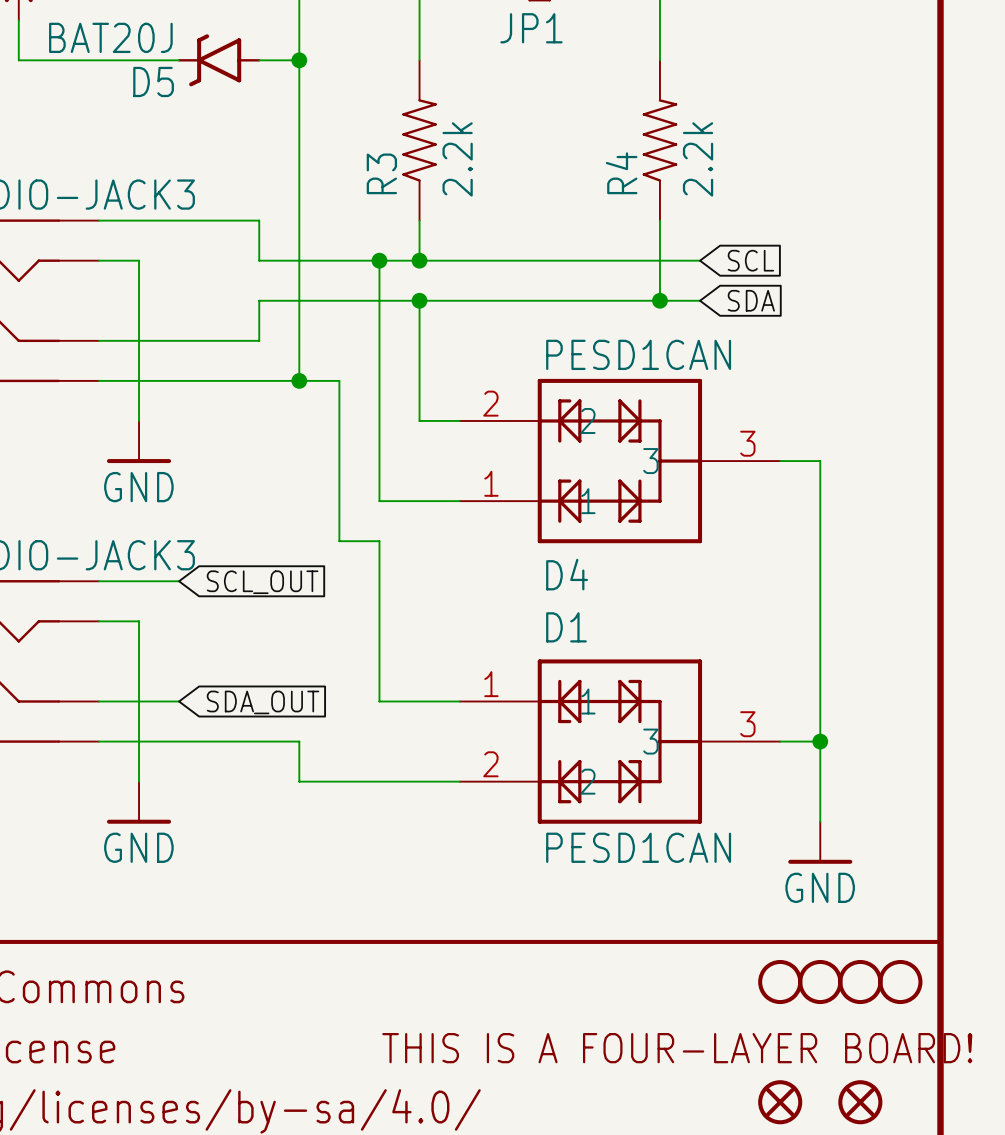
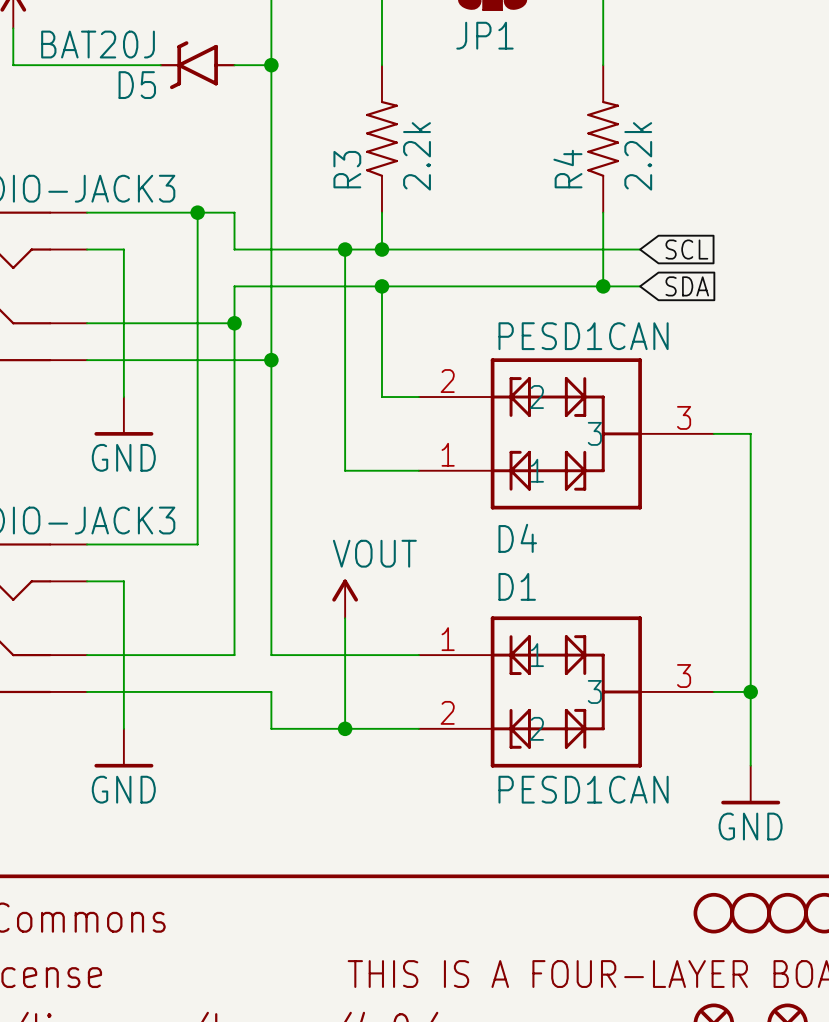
wire: none -> (197, 212) (197, 544) (160, 544)
junction: none -> (197, 212)
wire: none -> (234, 323) (234, 655) (160, 655)
junction: none -> (234, 323)
wire: (299, 380) (339, 380) (339, 541) (379, 541) (379, 661) -> (271, 360) (271, 655) (345, 655) (345, 728)
global label: SCL_OUT (262, 582) -> none
power symbol: none -> VOUT (345, 598)
global label: SDA_OUT (263, 702) -> none
junction: none -> (345, 728)

